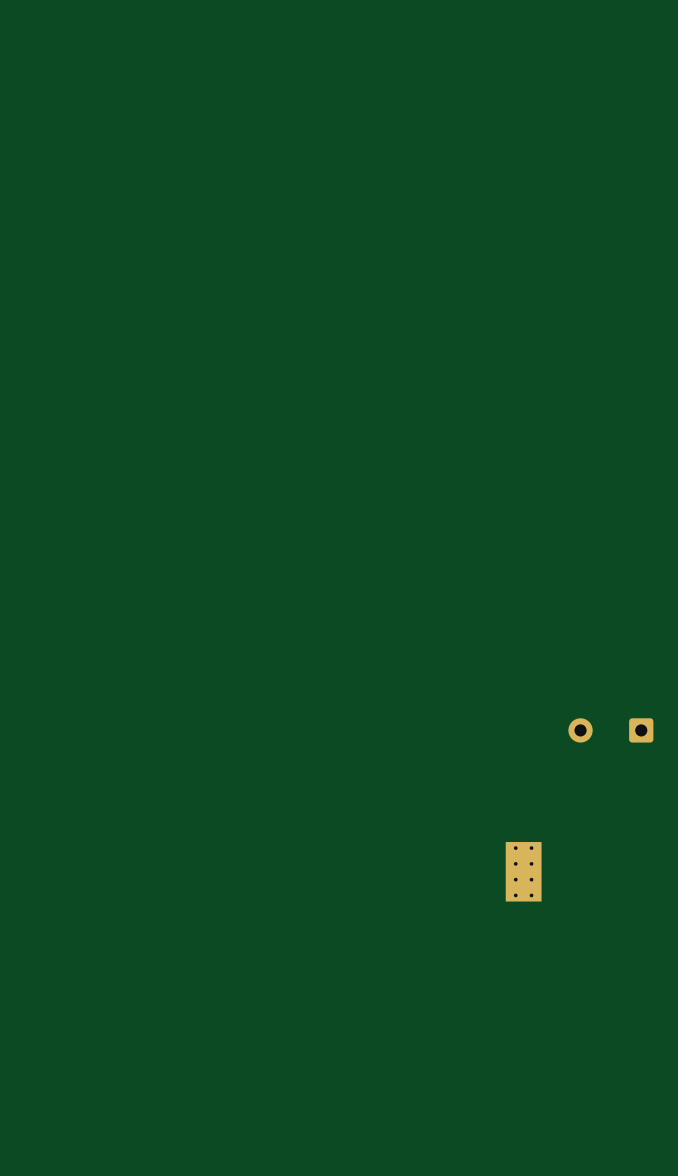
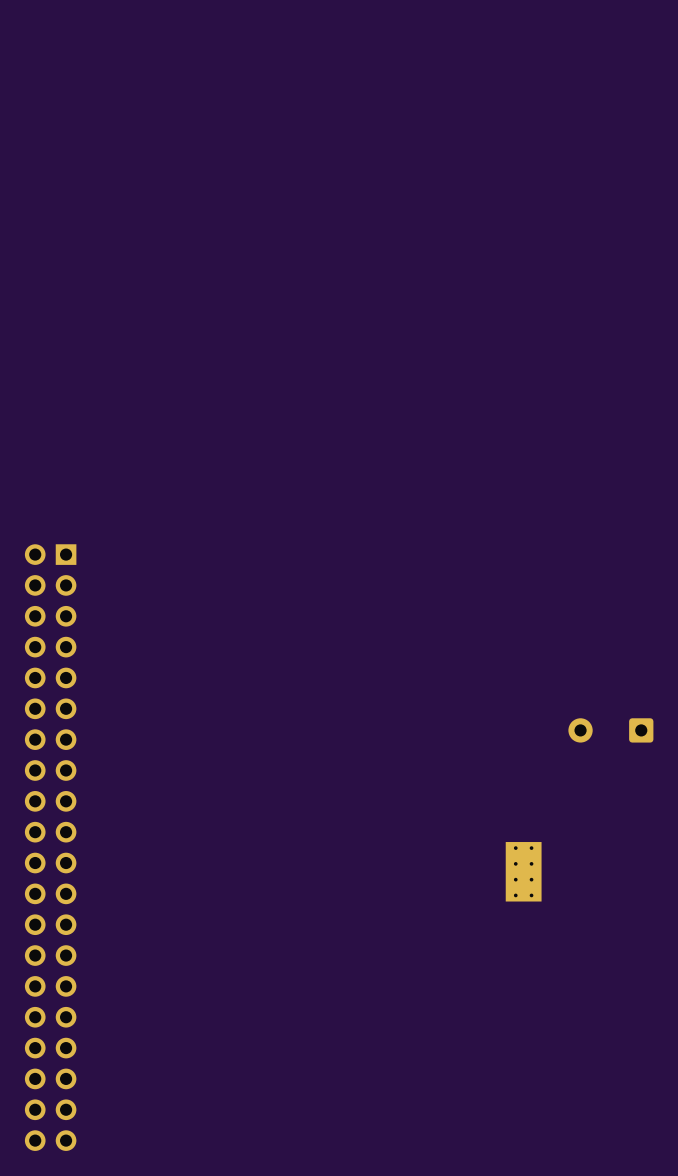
part: none -> (50, 847)

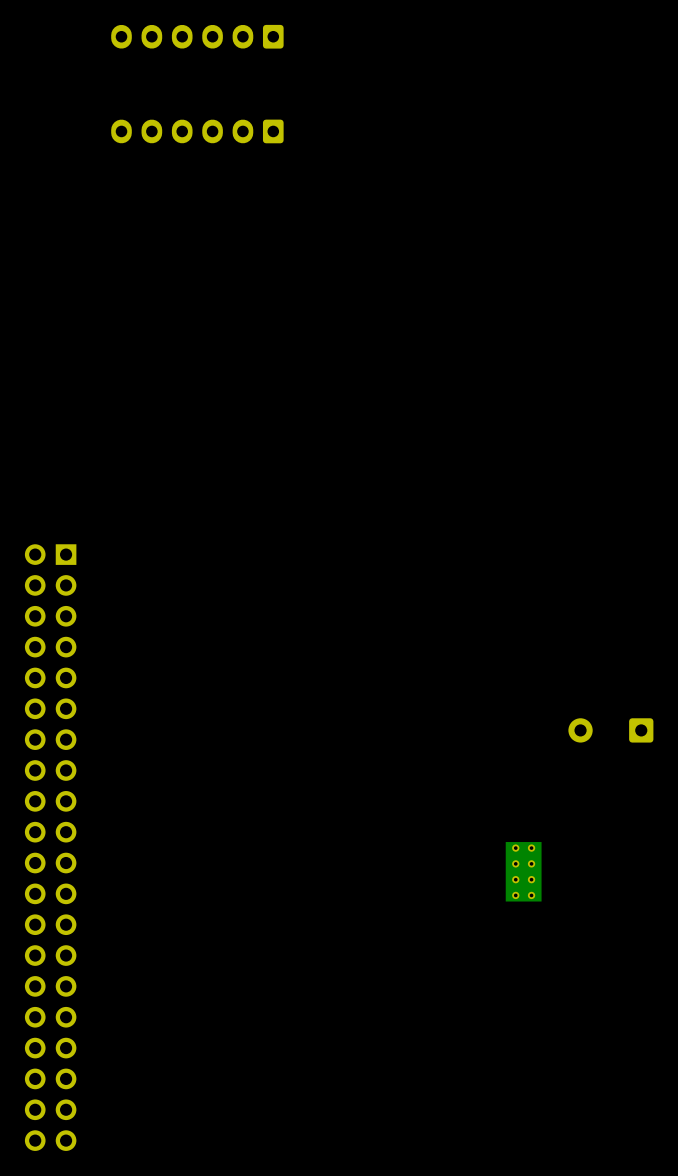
part: none -> (197, 36)
part: none -> (197, 131)

